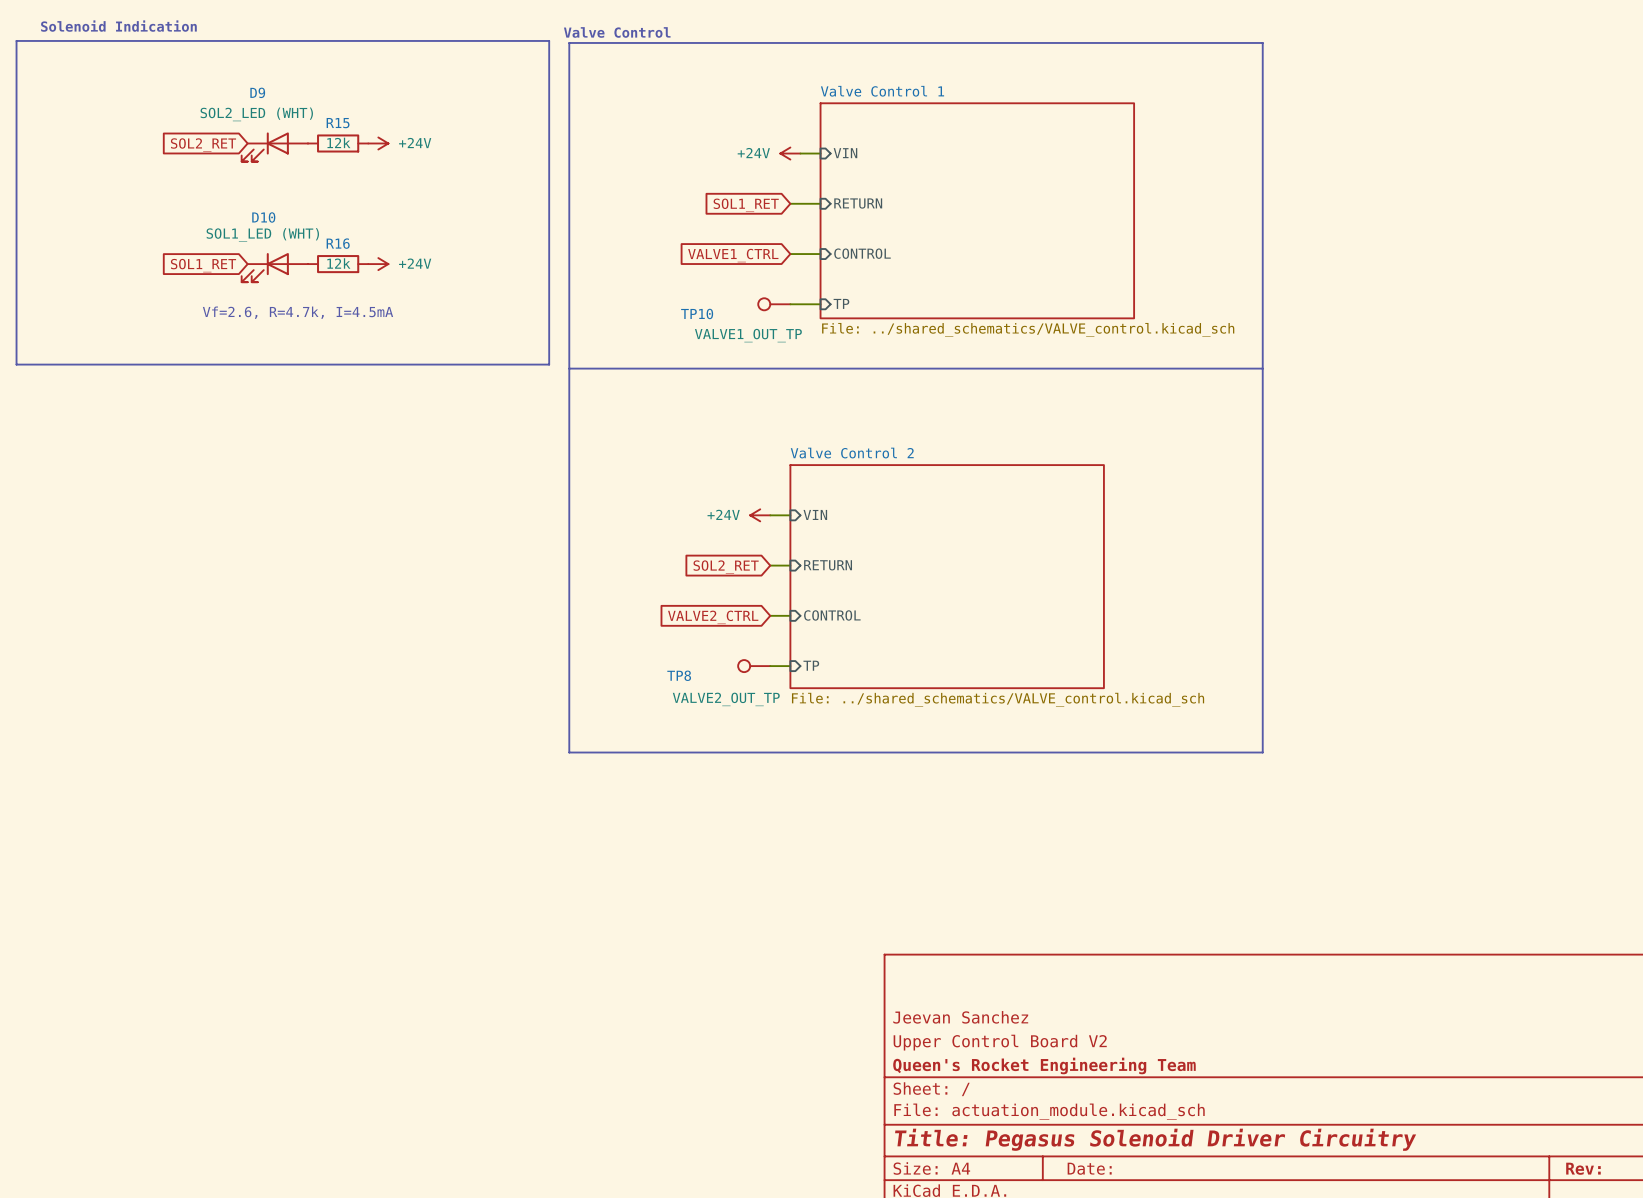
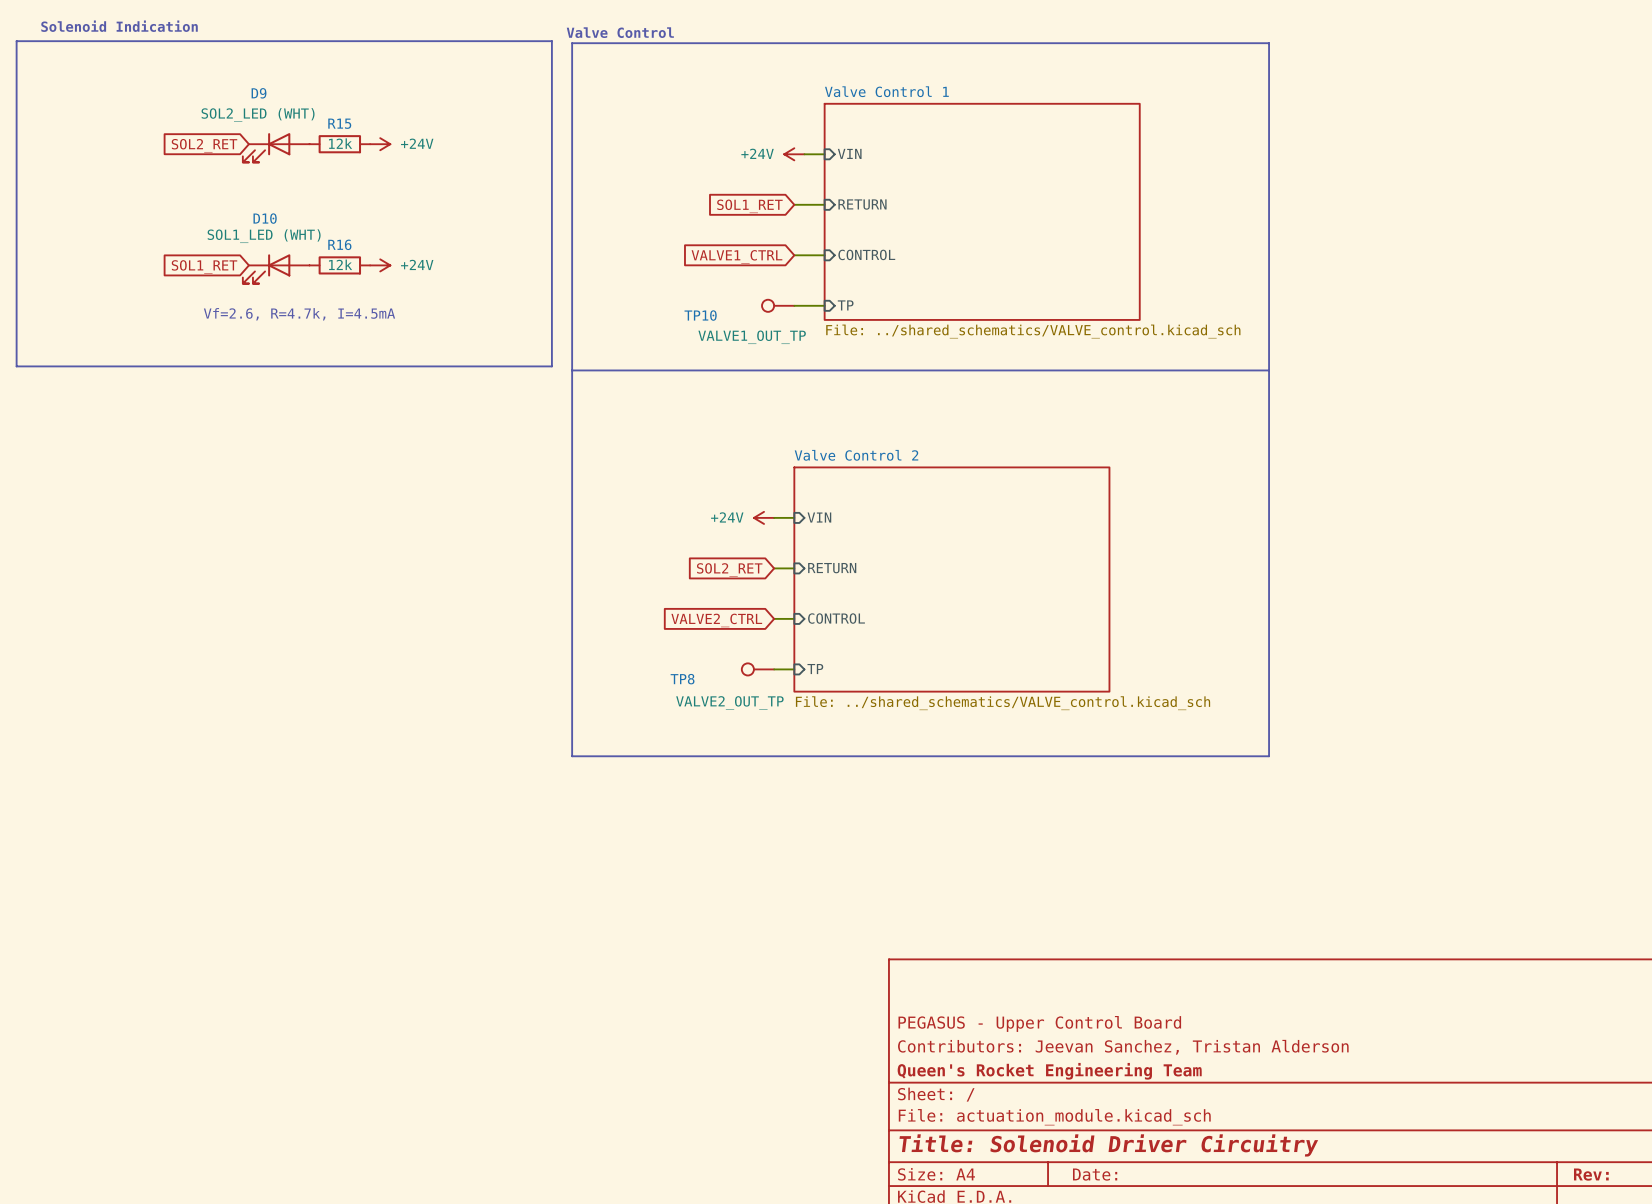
title block: Jeevan Sanchez (960, 1017) -> PEGASUS - Upper Control Board (1039, 1023)
title block: Upper Control Board V2 (1000, 1042) -> Contributors: Jeevan Sanchez, Tristan Alderson (1123, 1047)
title block: Title: Pegasus Solenoid Driver Circuitry (1155, 1139) -> Title: Solenoid Driver Circuitry (1108, 1145)

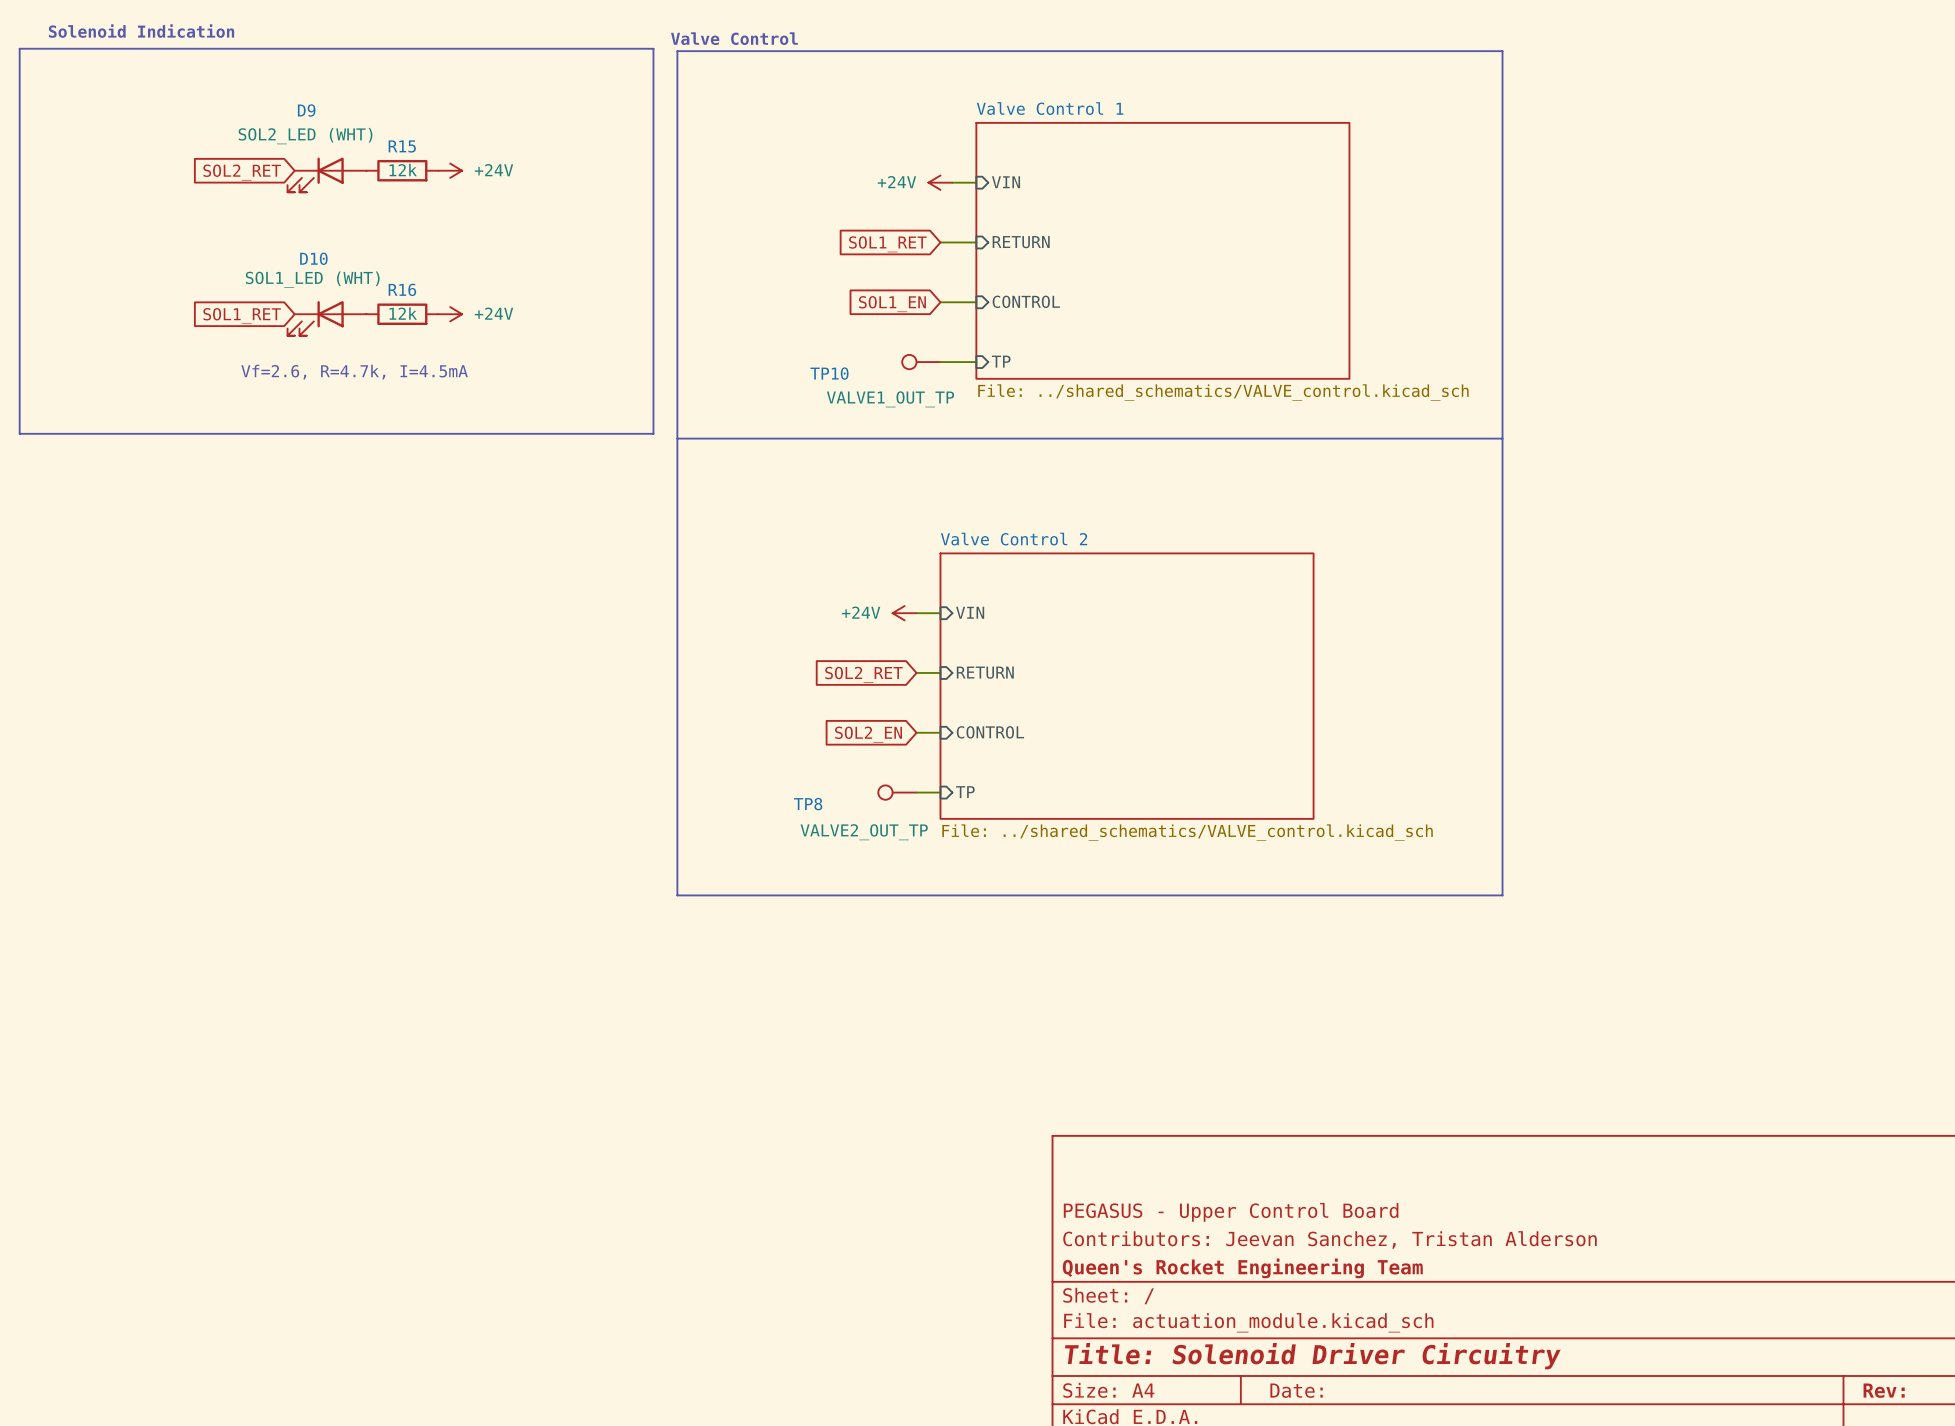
global label: VALVE1_CTRL (736, 256) -> SOL1_EN (892, 304)
global label: VALVE2_CTRL (716, 620) -> SOL2_EN (868, 734)

